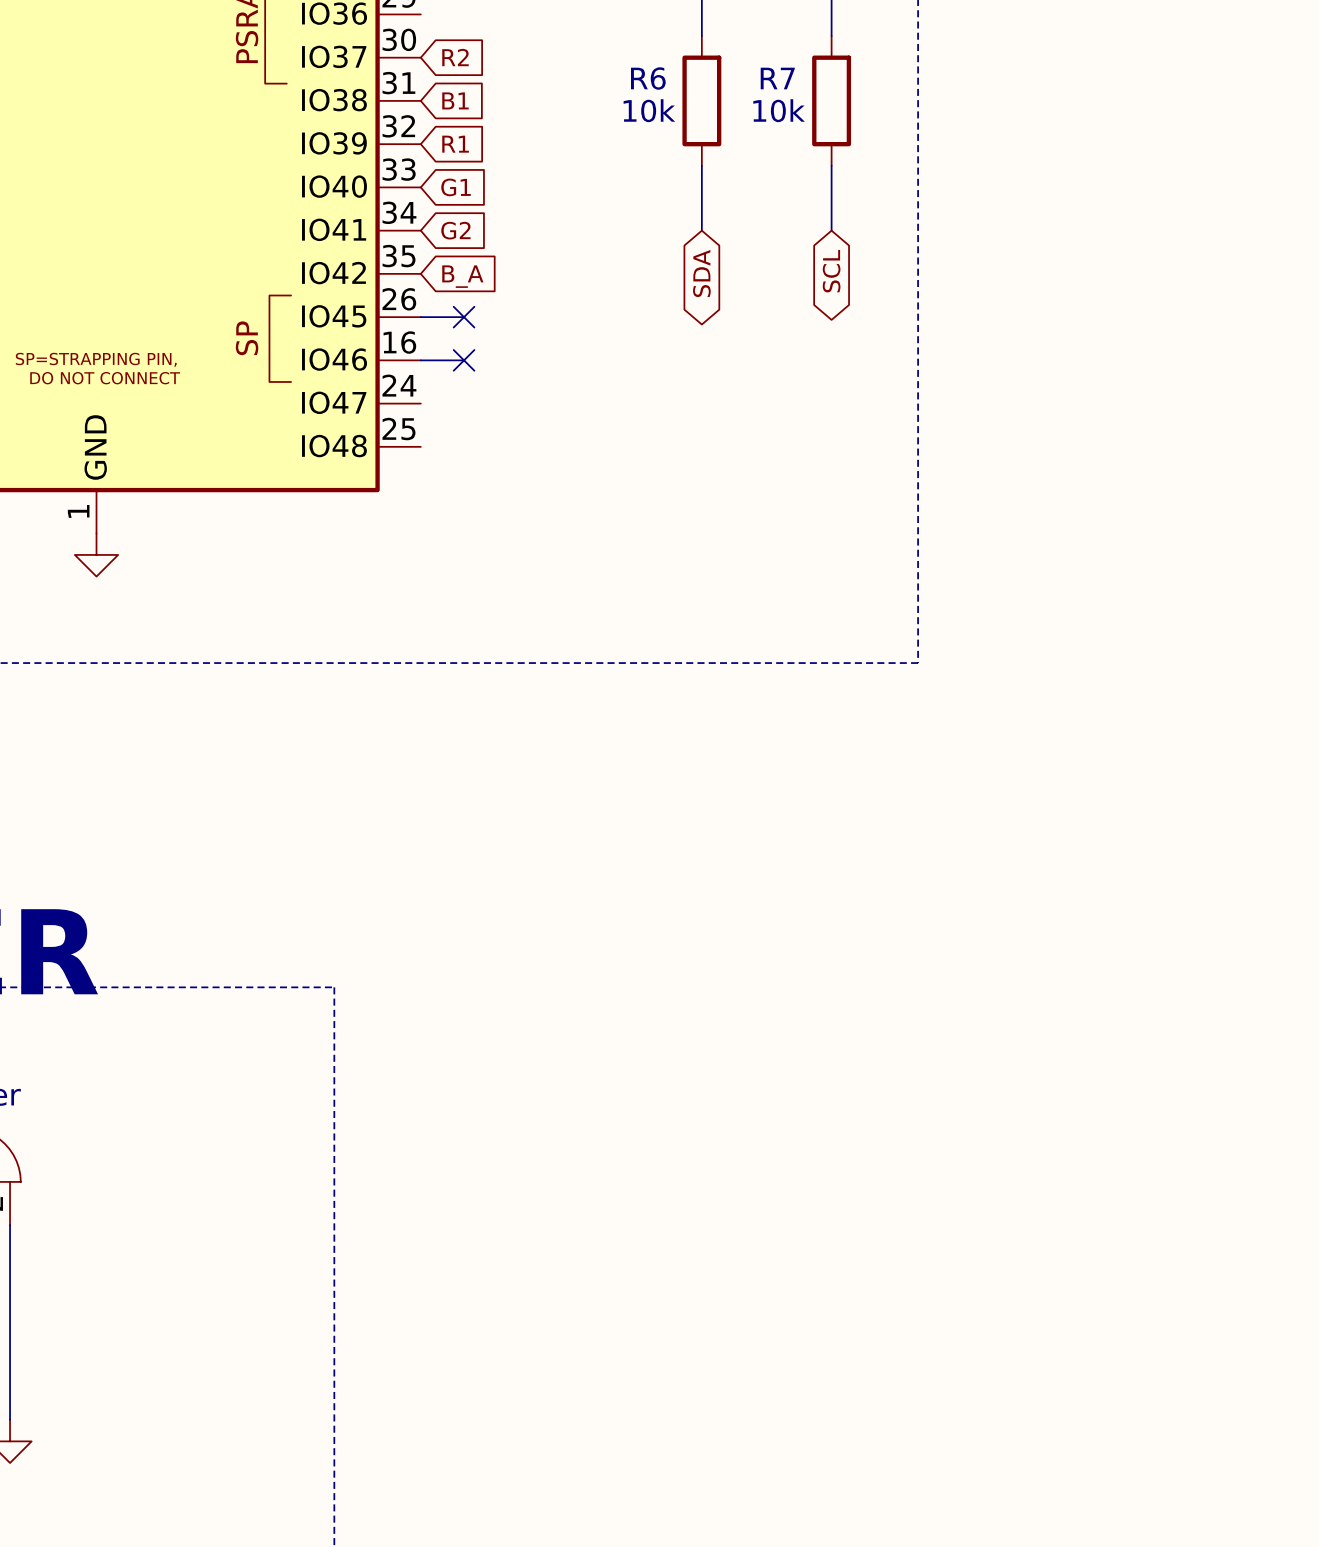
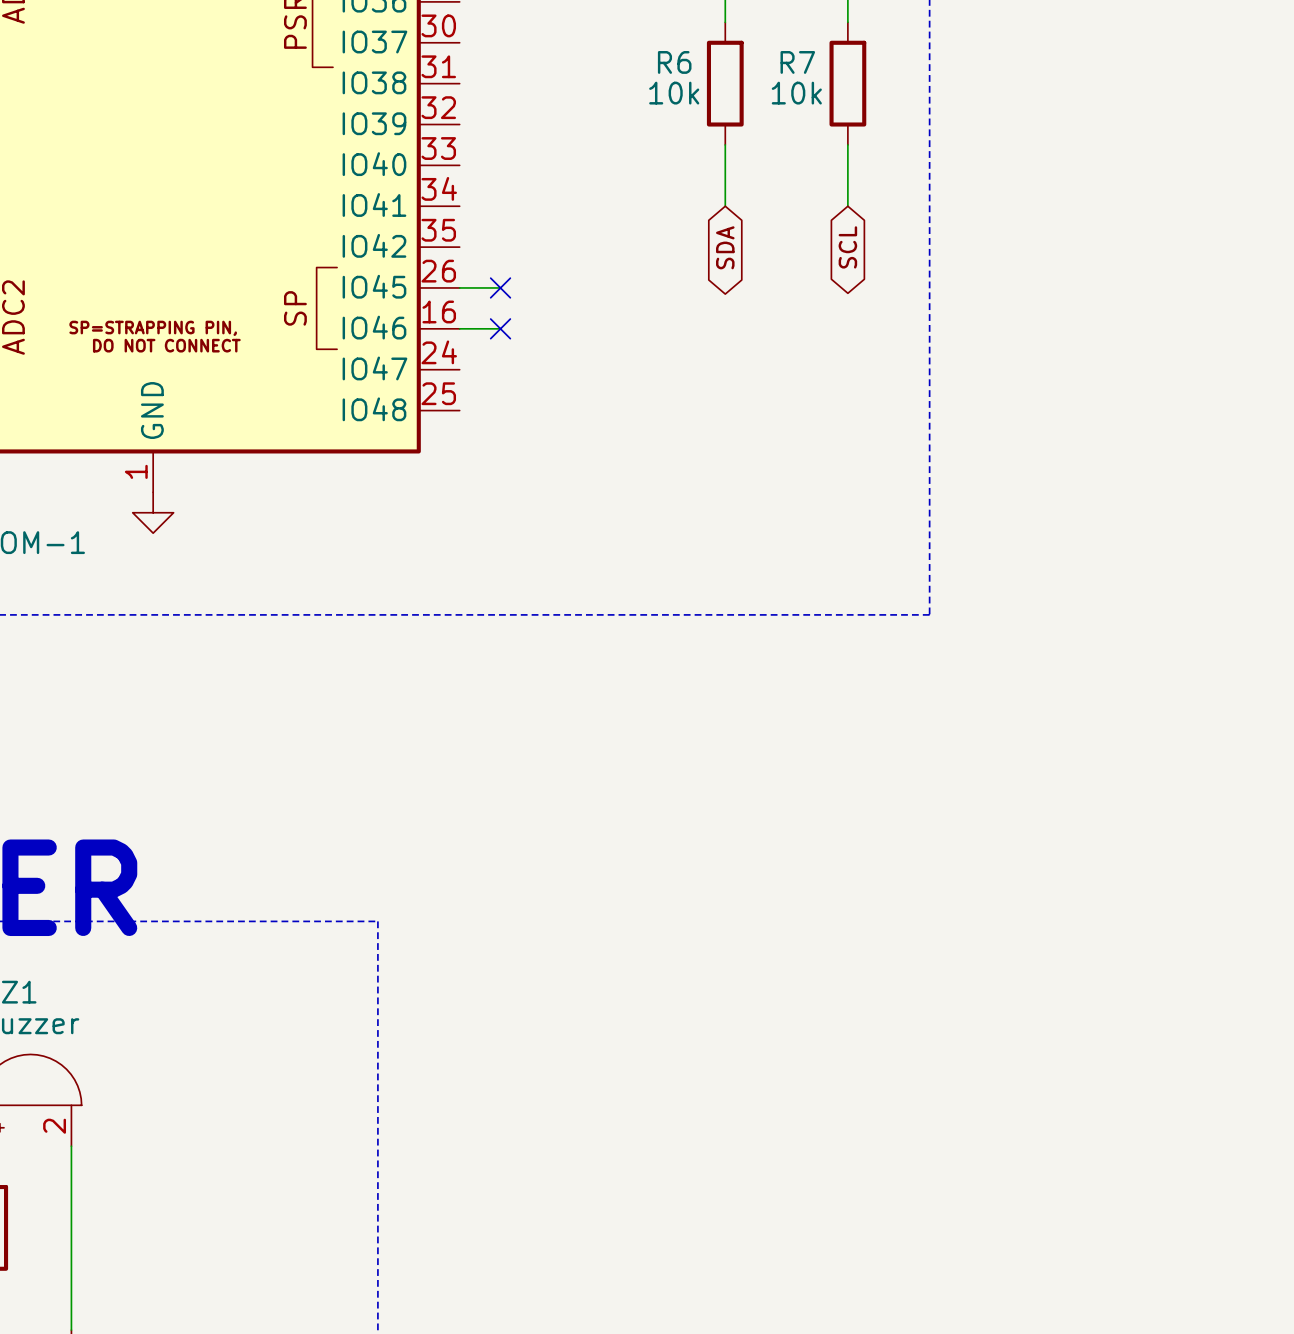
global label: R2 (455, 57) -> none
global label: B1 (455, 100) -> none
global label: R1 (455, 144) -> none
global label: G1 (456, 187) -> none
global label: G2 (455, 230) -> none
global label: B_A (462, 276) -> none

